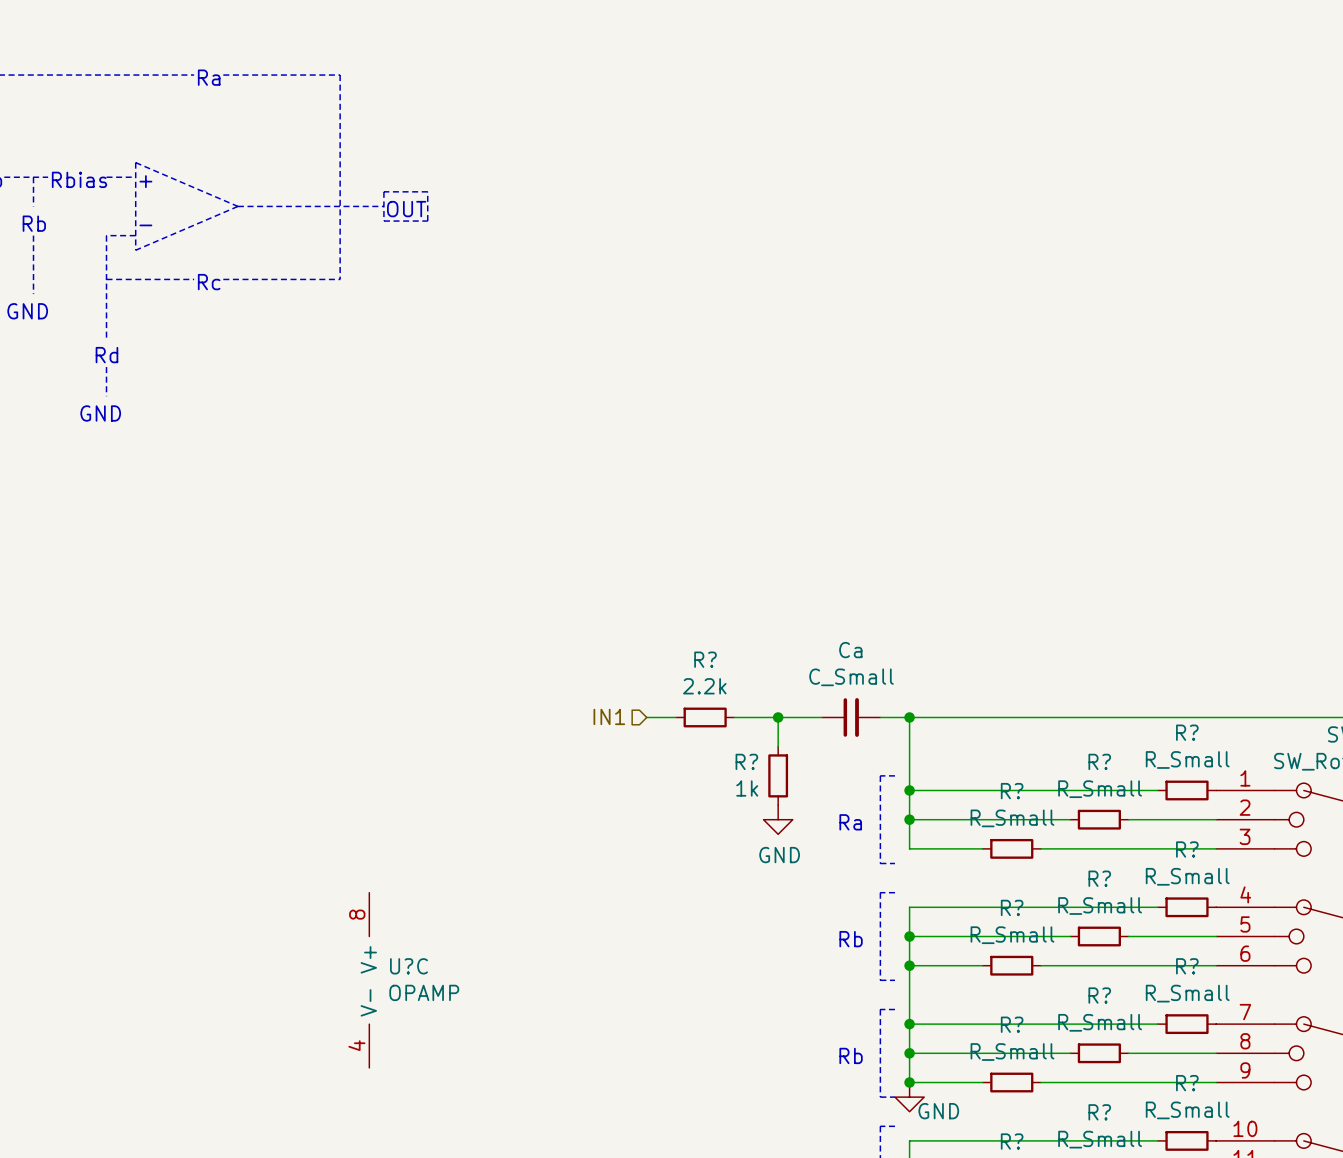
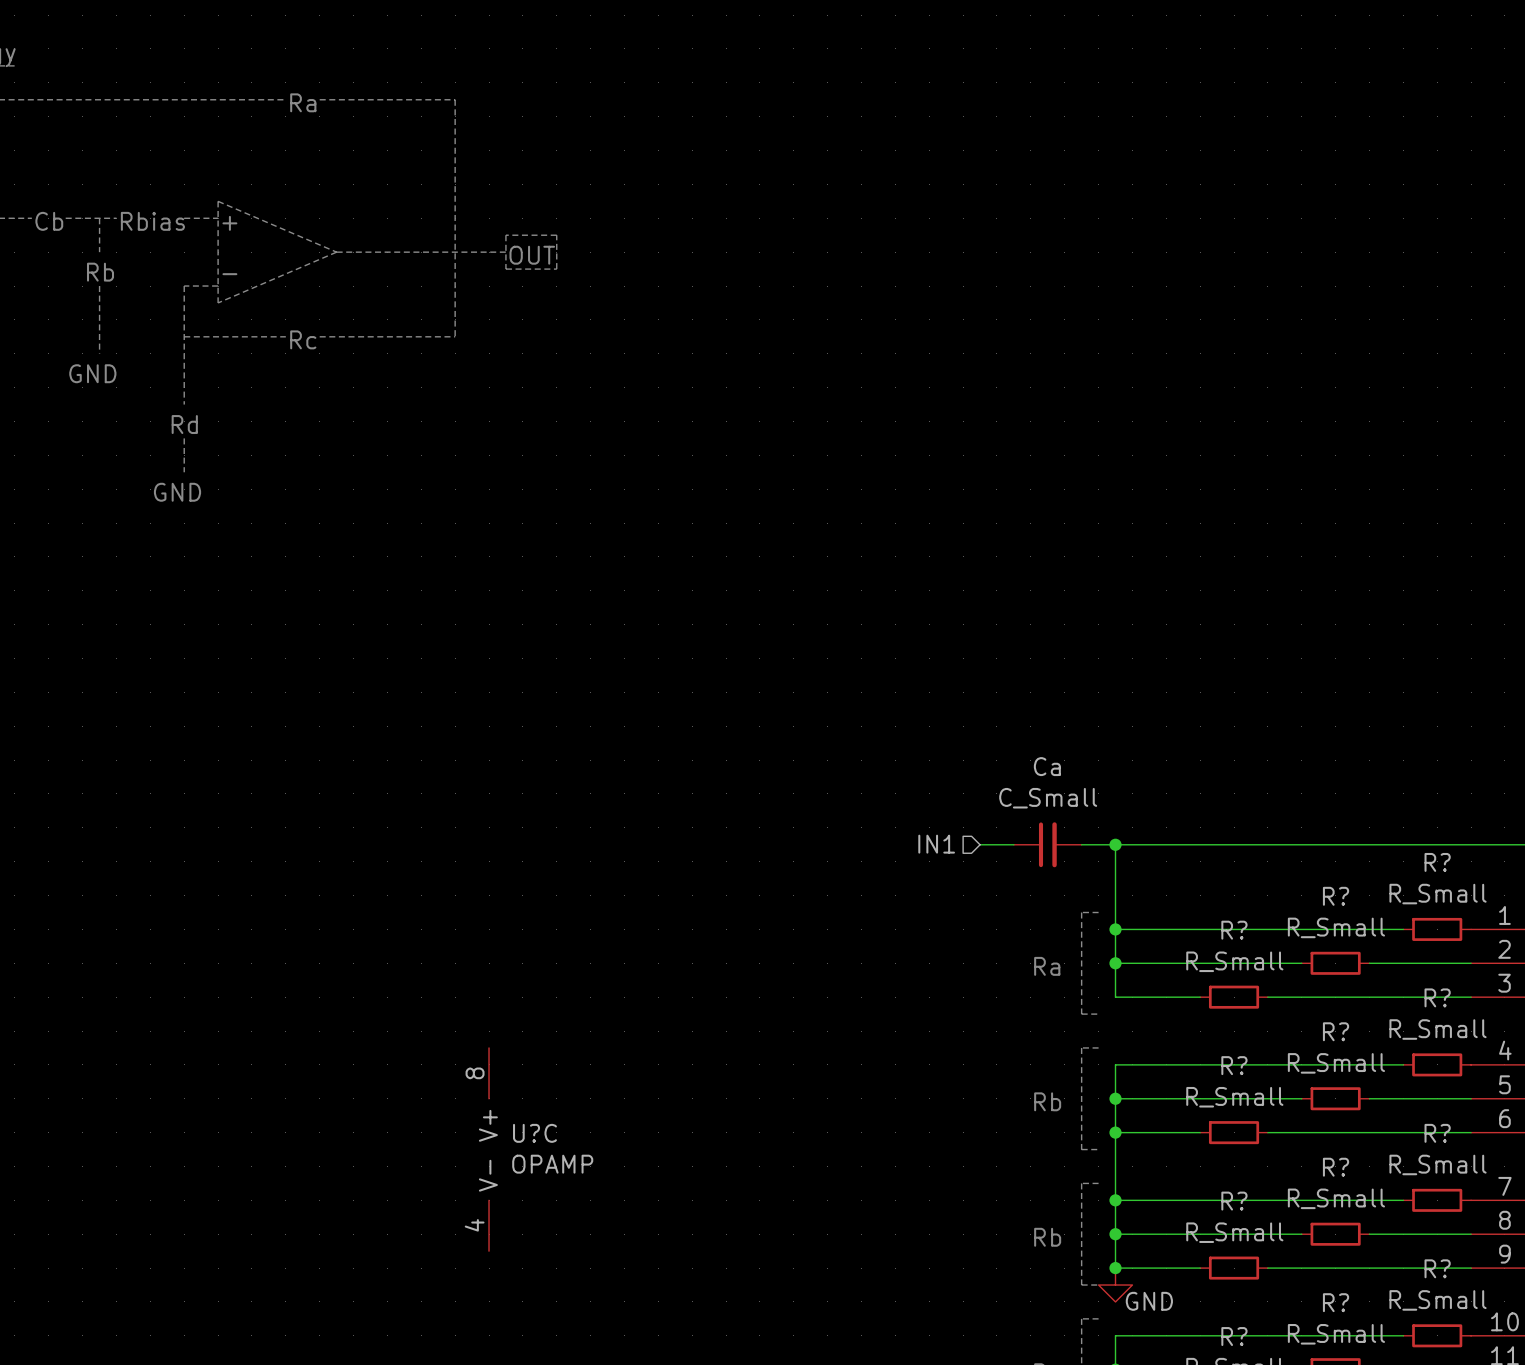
hierarchical label position: IN1 (609, 716) -> IN1 (936, 844)
wire: (646, 717) (675, 717) -> none
R?: 2.2k (705, 717) -> none
wire: (734, 717) (792, 717) -> none
wire: (778, 717) (778, 746) -> none
junction: (778, 717) -> none
R?: 1k (778, 775) -> none
power symbol: GND (778, 819) -> none

